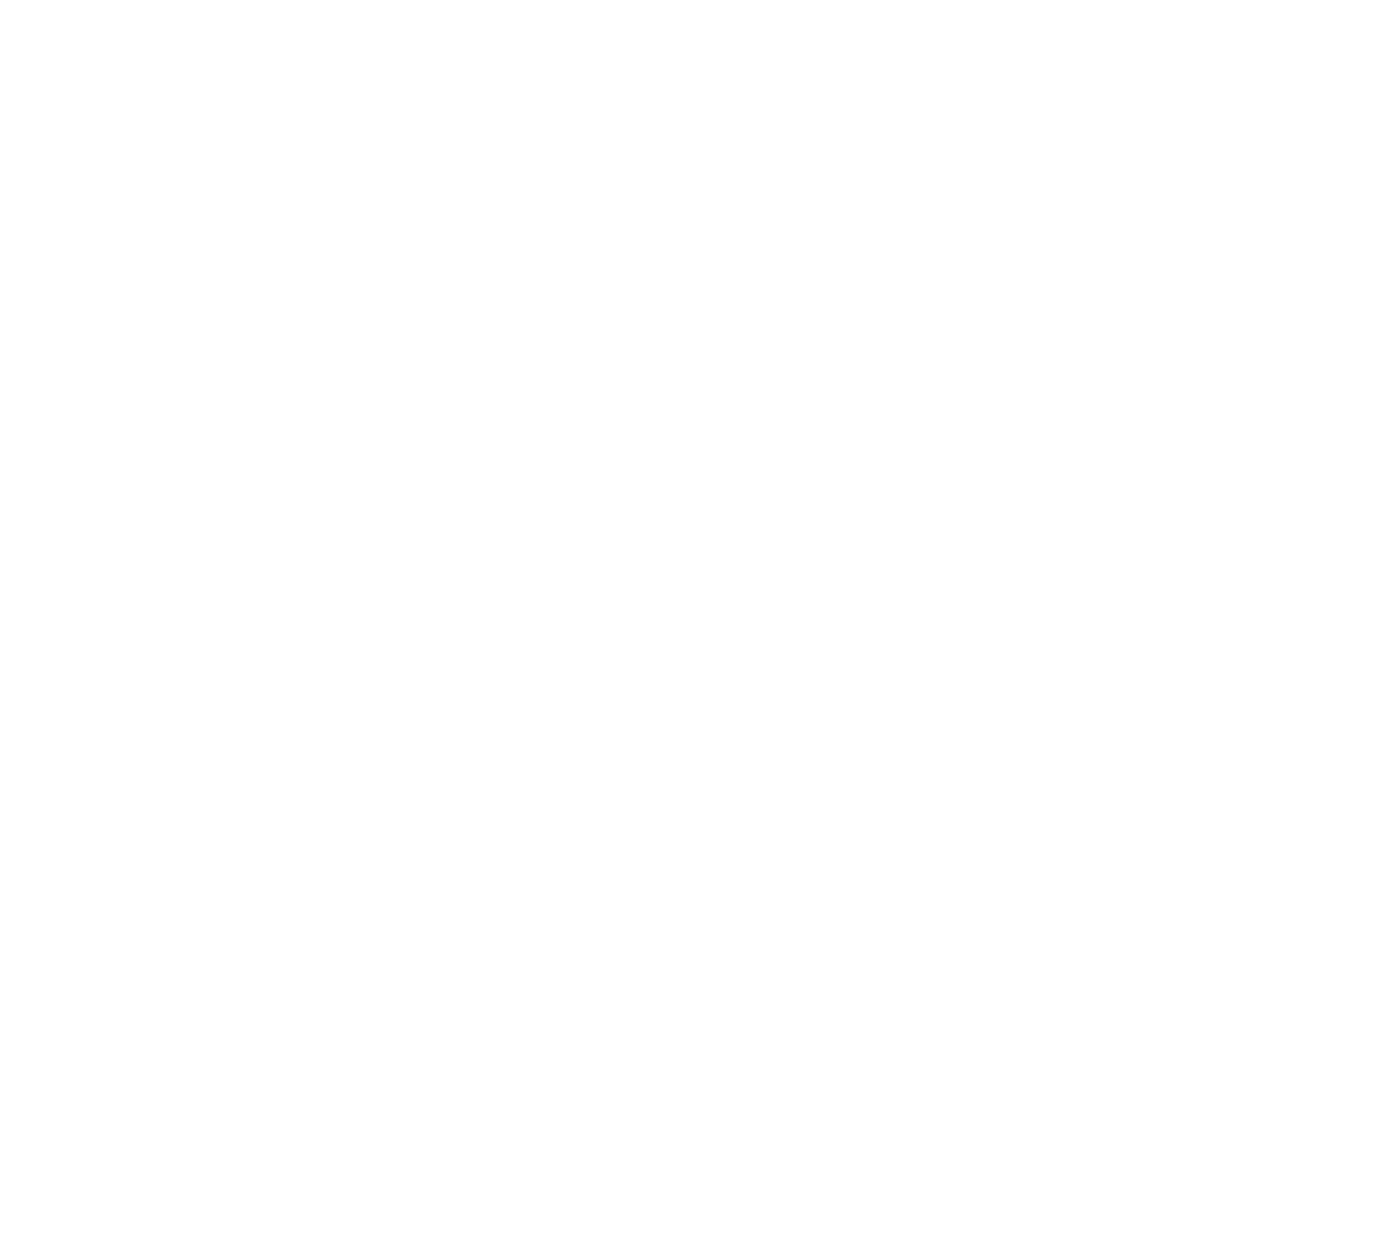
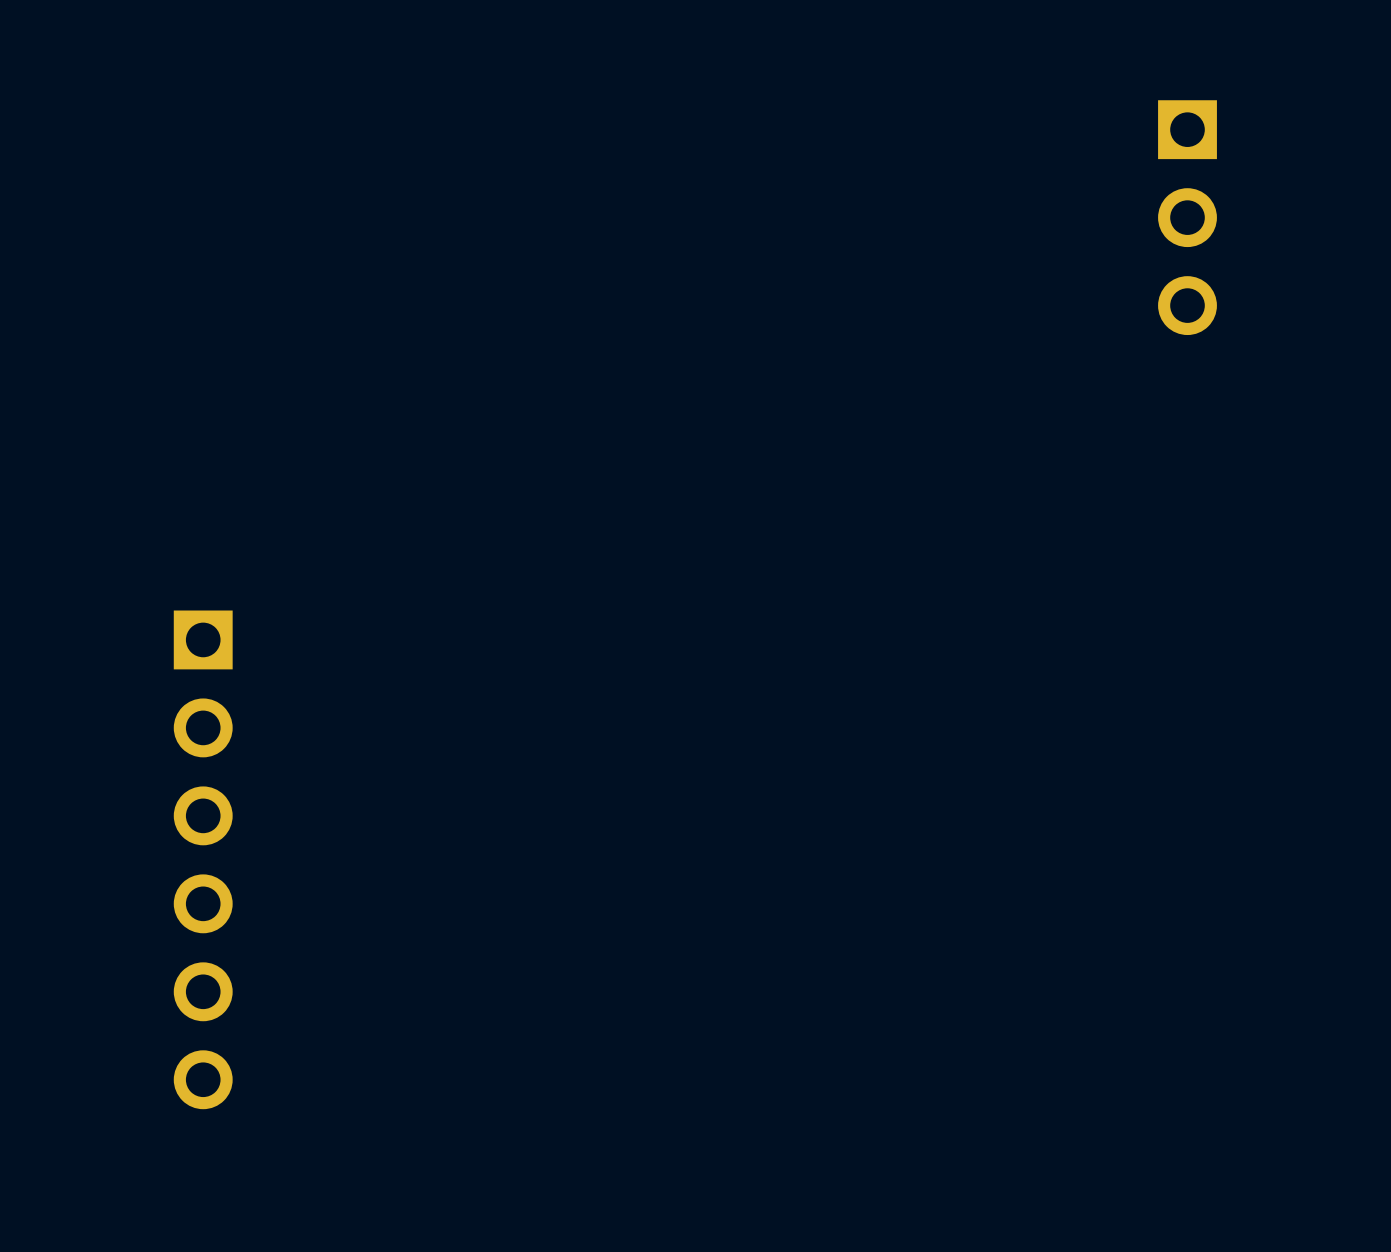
part: none -> (1187, 217)
part: none -> (203, 859)

